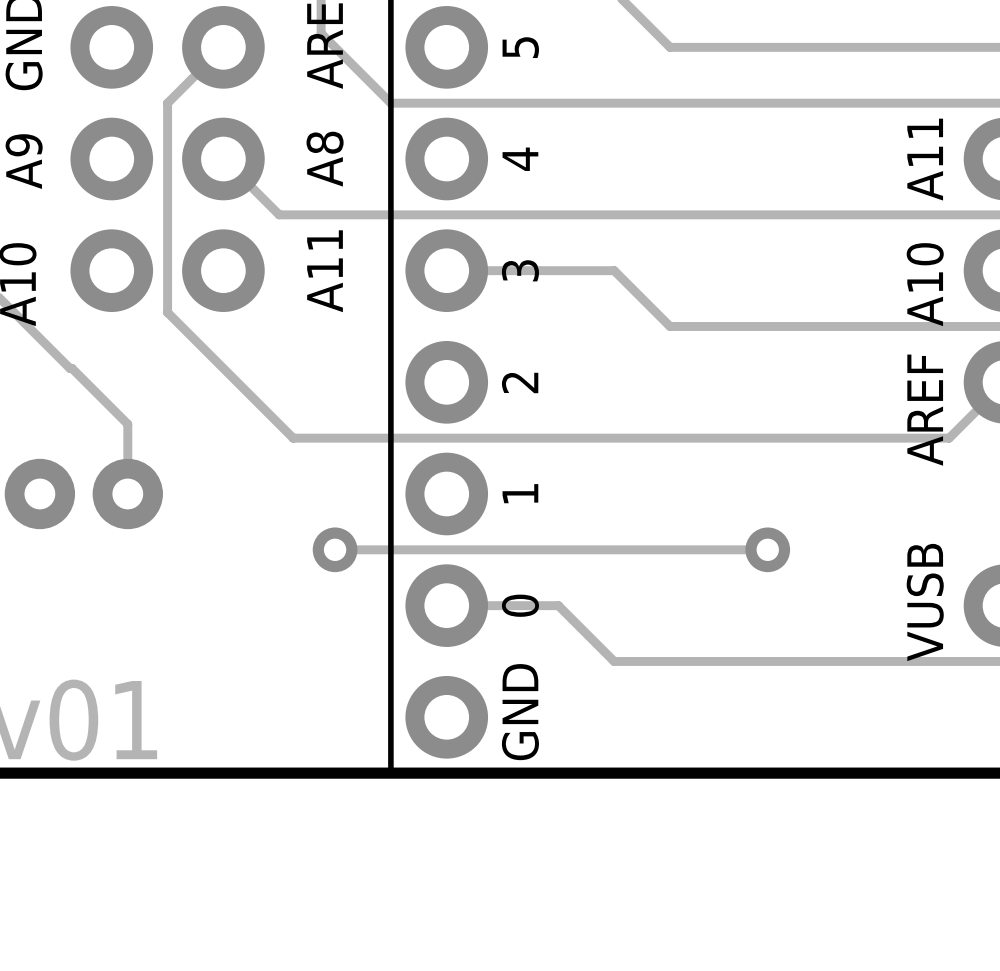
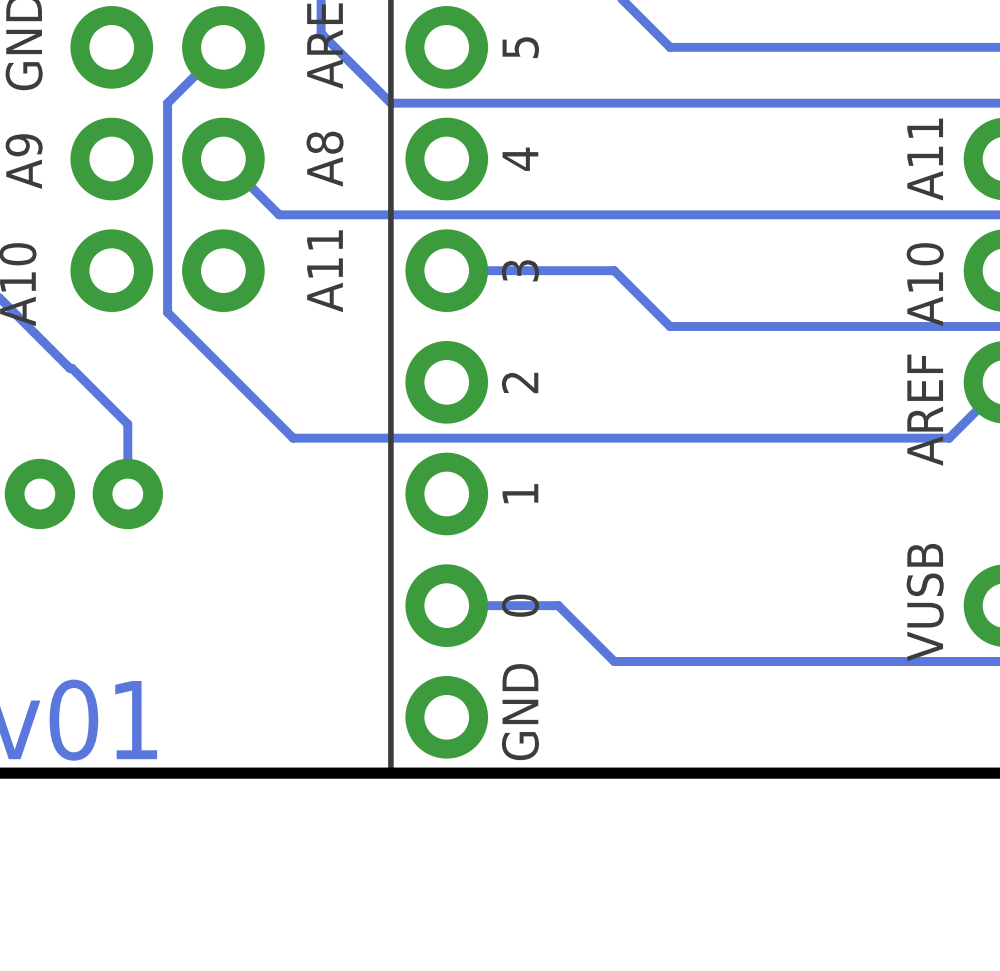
via: (335, 549) -> none
track: (767, 549) (335, 549) -> none
via: (767, 549) -> none

